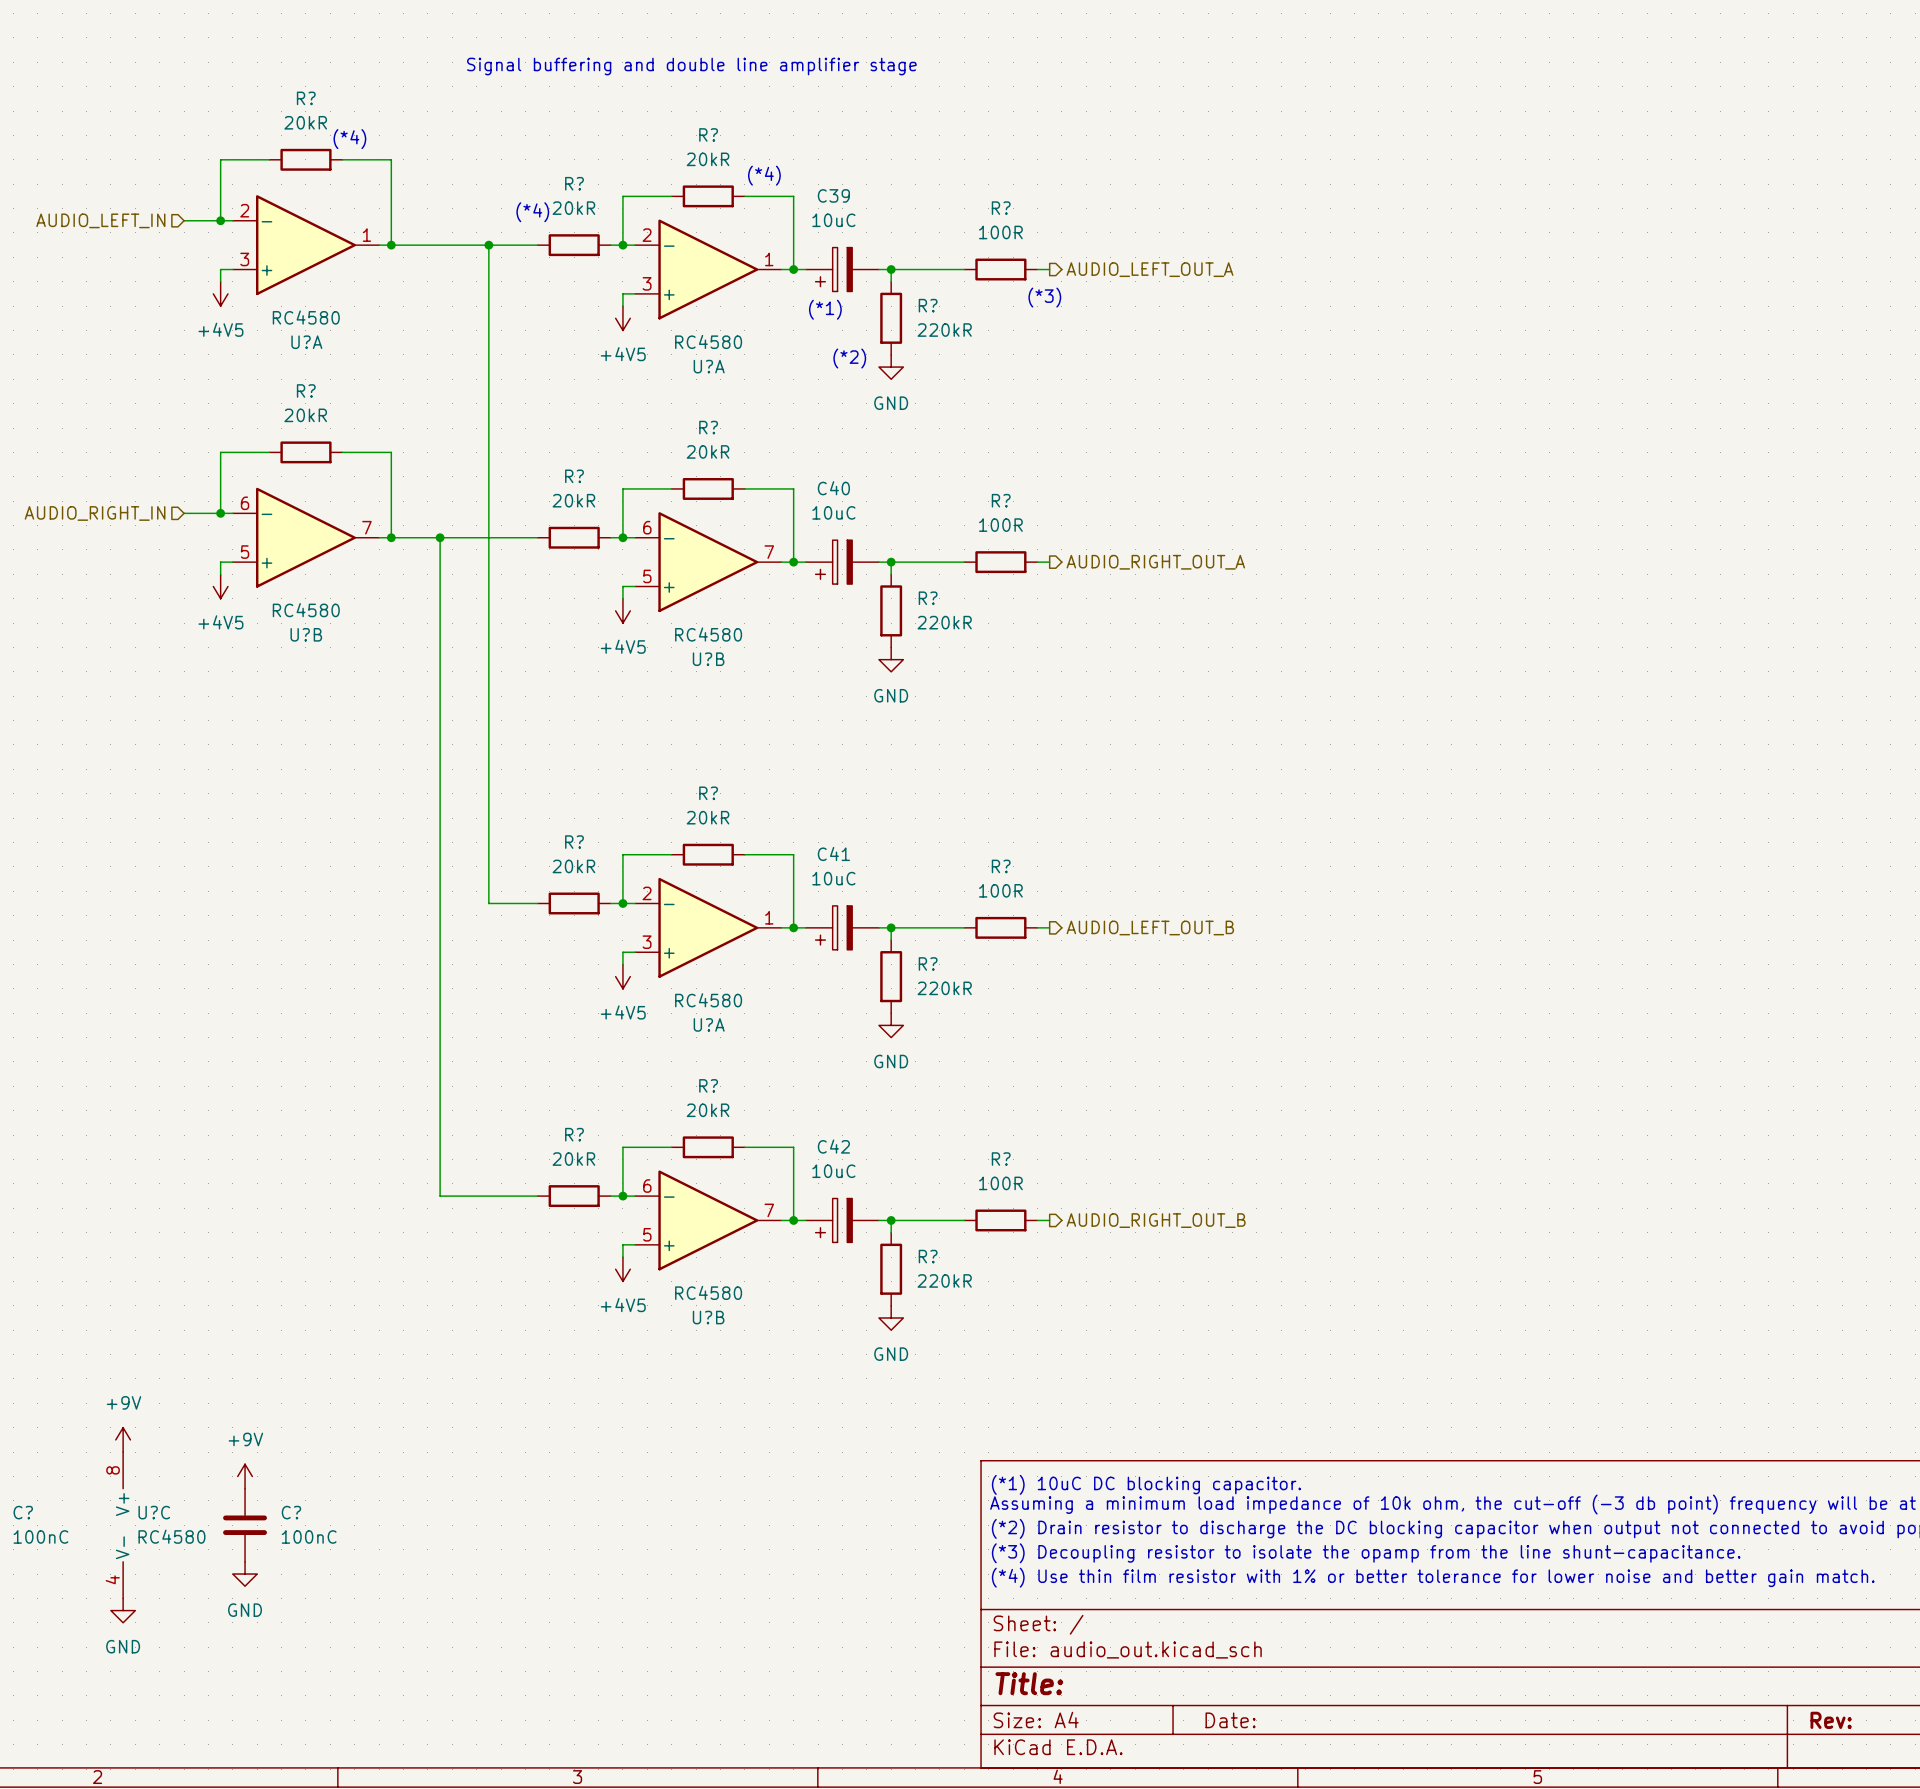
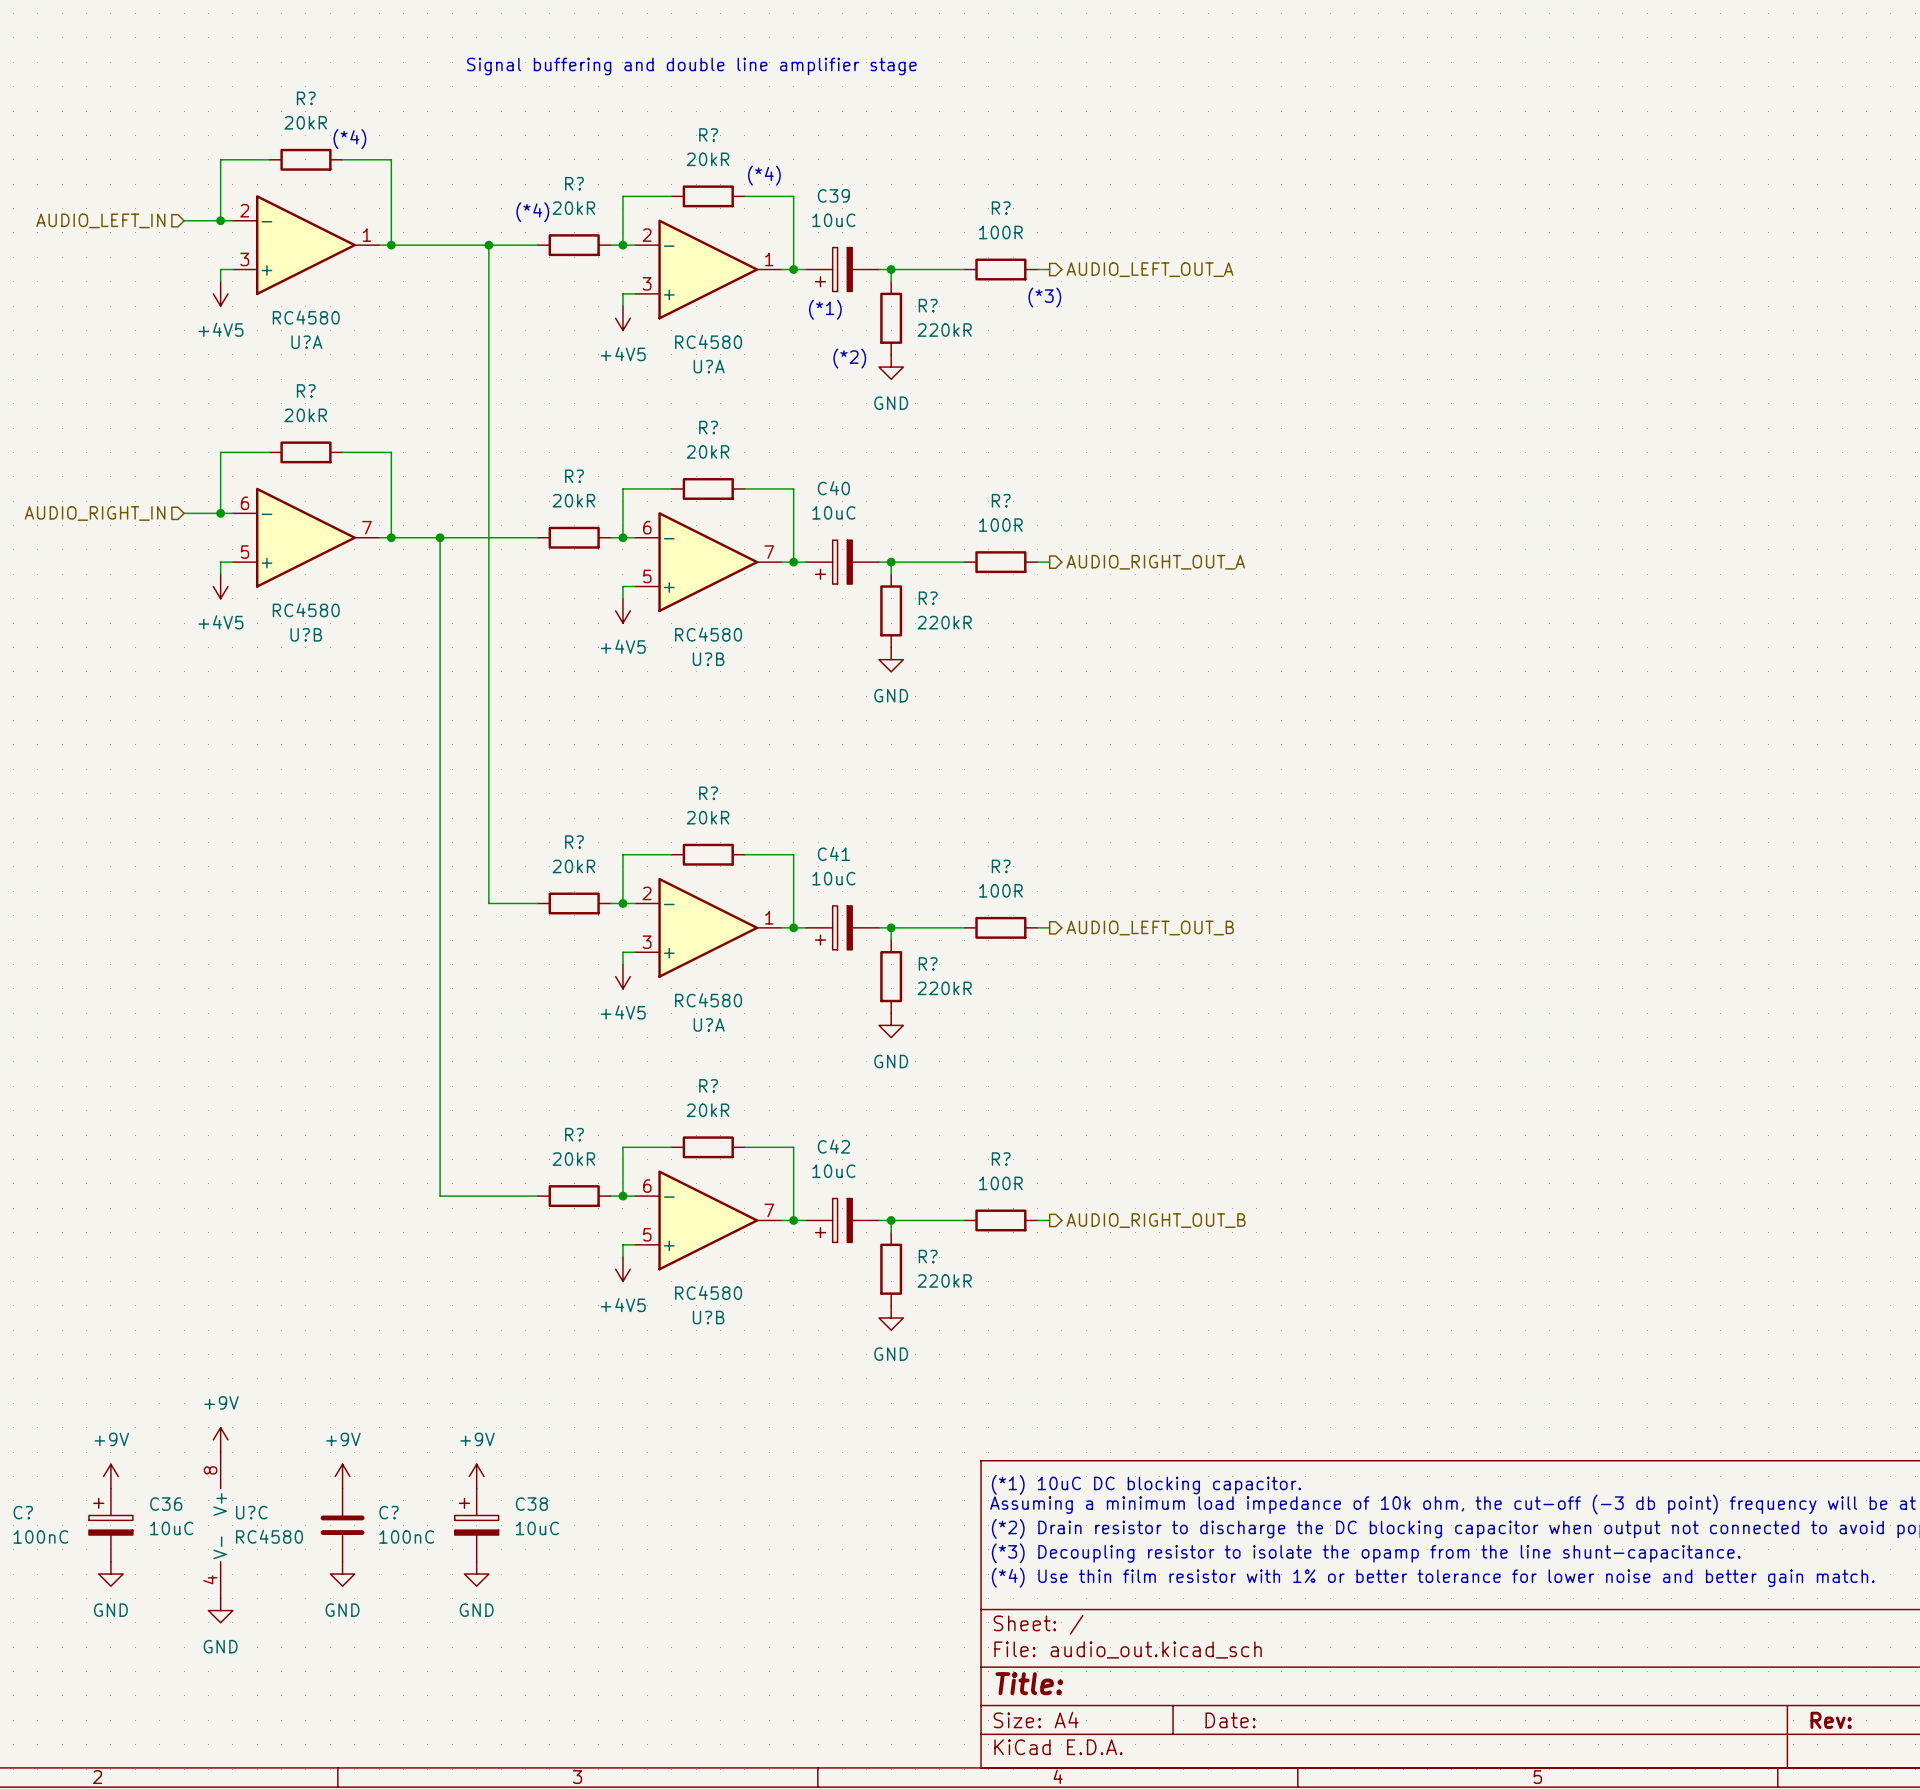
power symbol position: +9V (123, 1439) -> +9V (110, 1476)
power symbol position: +9V (245, 1476) -> +9V (220, 1439)
power symbol: none -> +9V (342, 1476)
power symbol: none -> +9V (476, 1476)
C36: none -> 10uC (110, 1525)
U?C position: (123, 1525) -> (220, 1525)
C? position: (245, 1525) -> (342, 1525)
C38: none -> 10uC (476, 1525)
power symbol position: GND (245, 1574) -> GND (220, 1610)
power symbol: none -> GND (342, 1574)
power symbol: none -> GND (476, 1574)
power symbol position: GND (123, 1610) -> GND (110, 1574)

